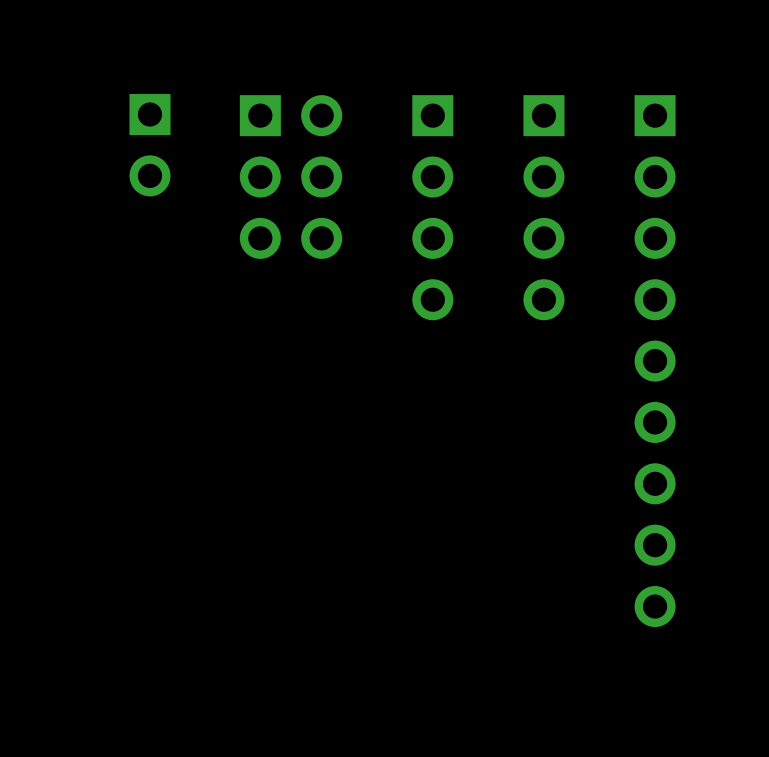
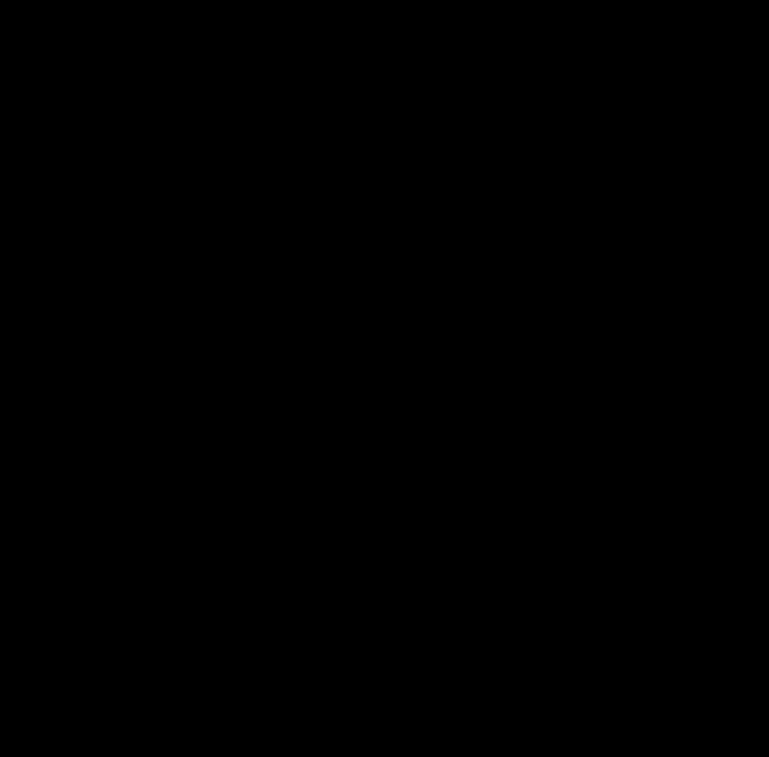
part: (149, 145) -> none
part: (291, 177) -> none
part: (432, 207) -> none
part: (543, 207) -> none
part: (655, 361) -> none

